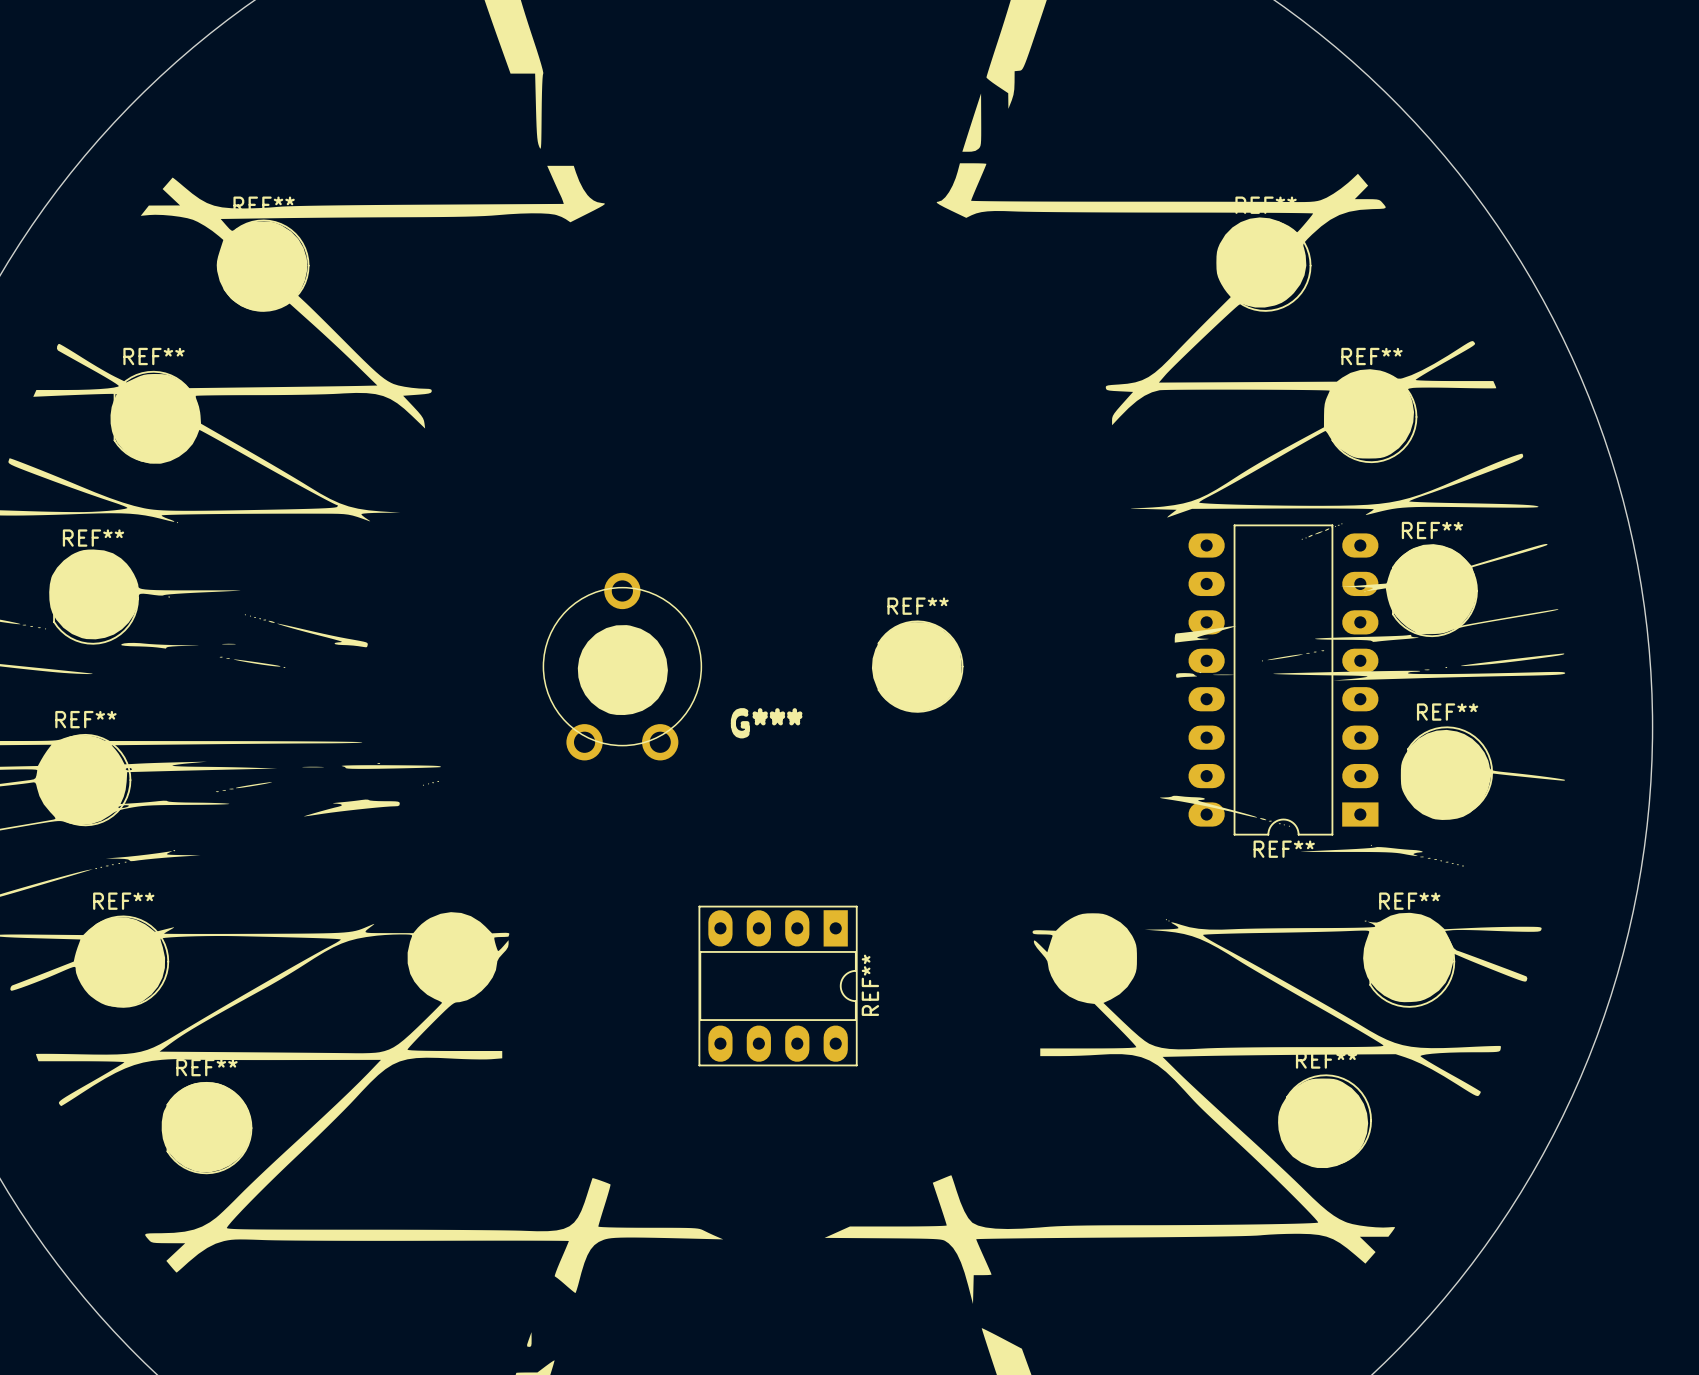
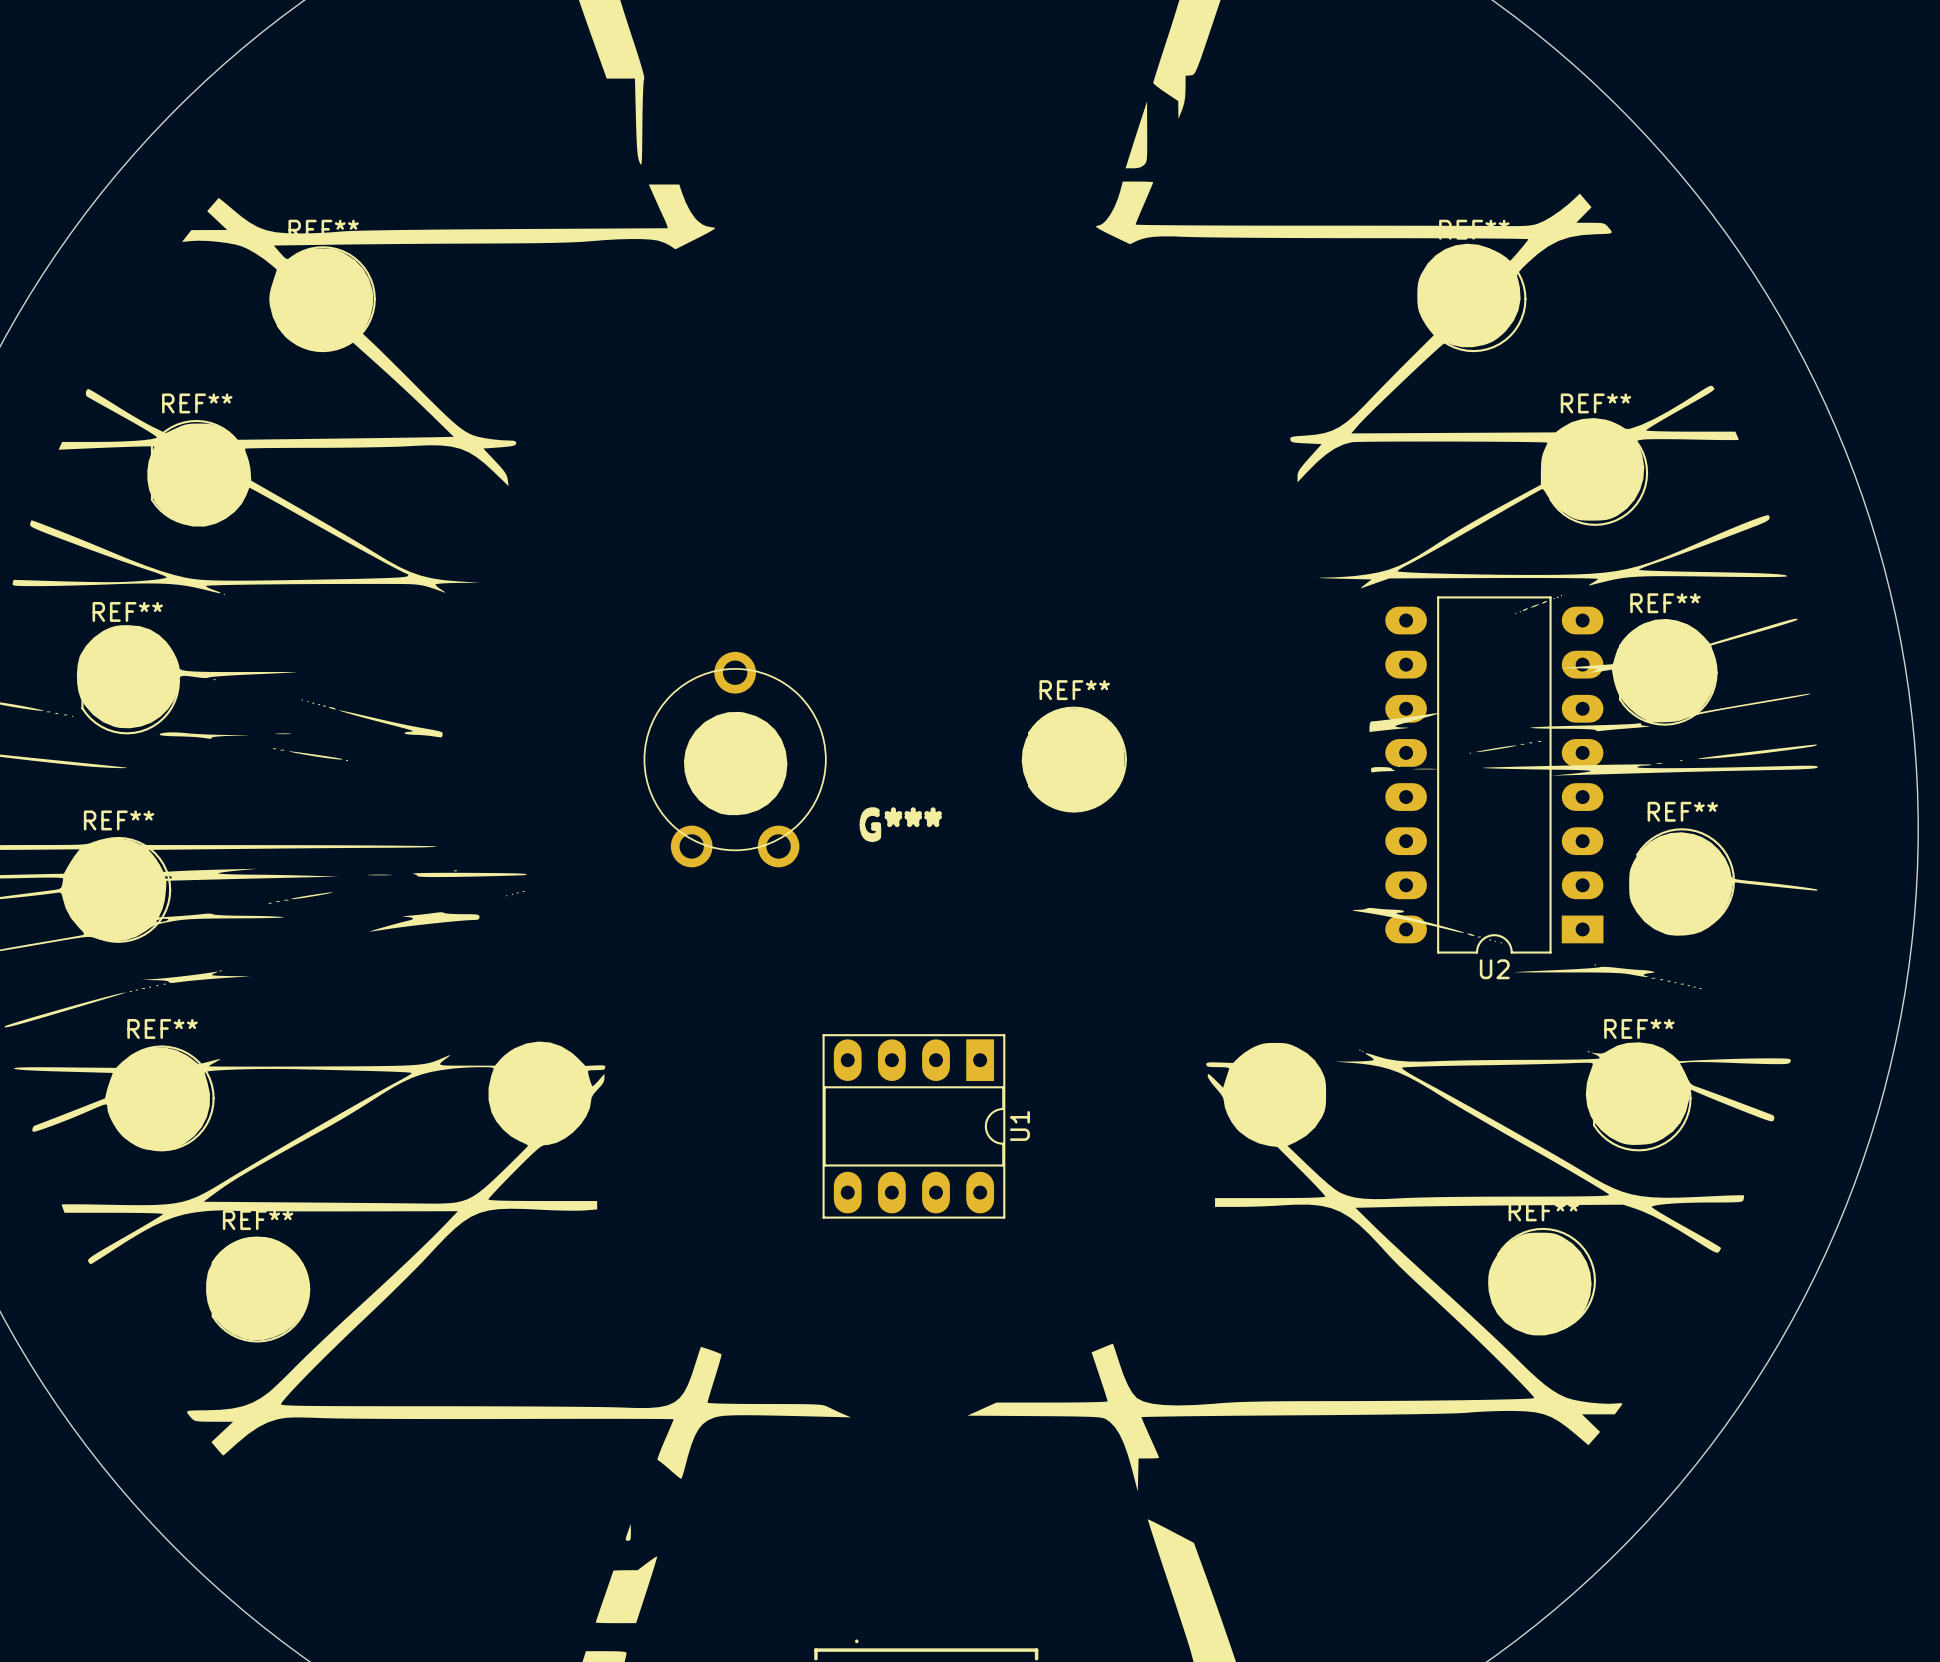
REF** name: REF** (1284, 849) -> U2 (1494, 969)
REF** name: REF** (870, 985) -> U1 (1019, 1125)

